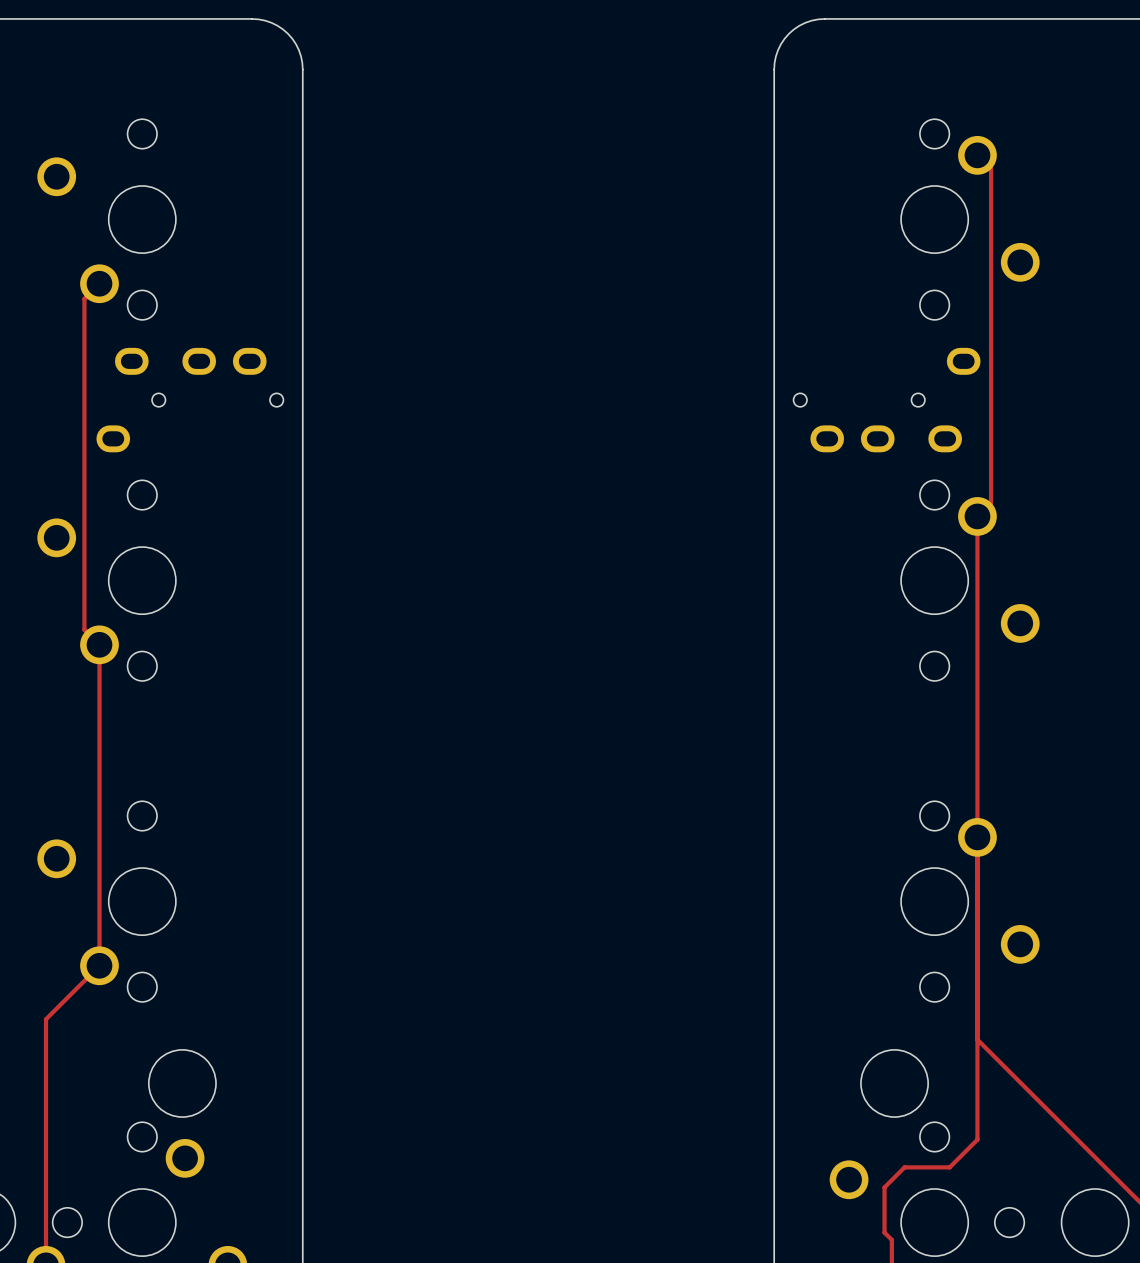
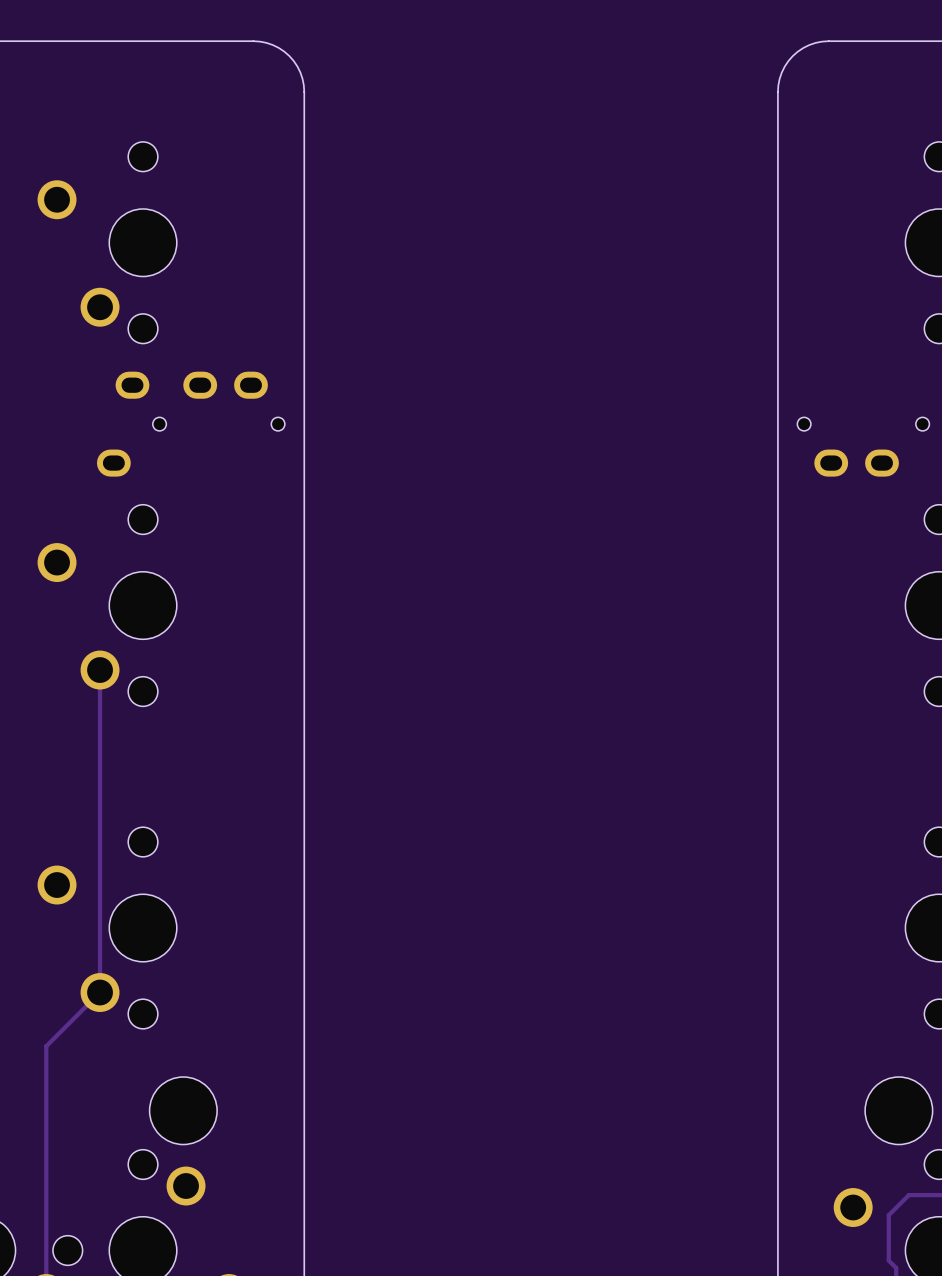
track: (99, 283) (84, 298) (84, 629) (99, 644) -> none

